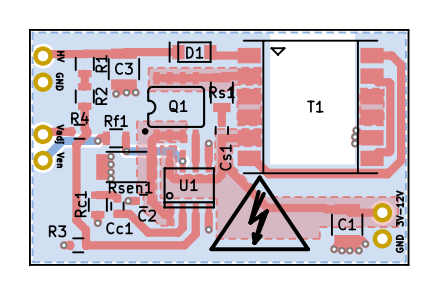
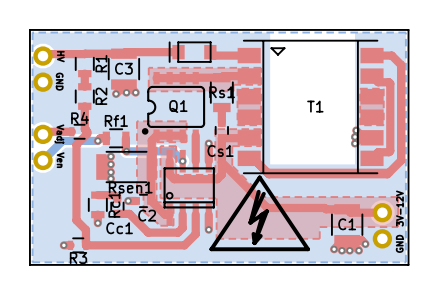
D1 name: D1 (194, 52) -> none
Cs1 name rotation: 0° (225, 157) -> 90° clockwise (220, 150)
U1 name: U1 (188, 185) -> none
Rc1 name position: Rc1 (80, 204) -> Rc1 (114, 204)
R3 name position: R3 (57, 231) -> R3 (78, 258)

